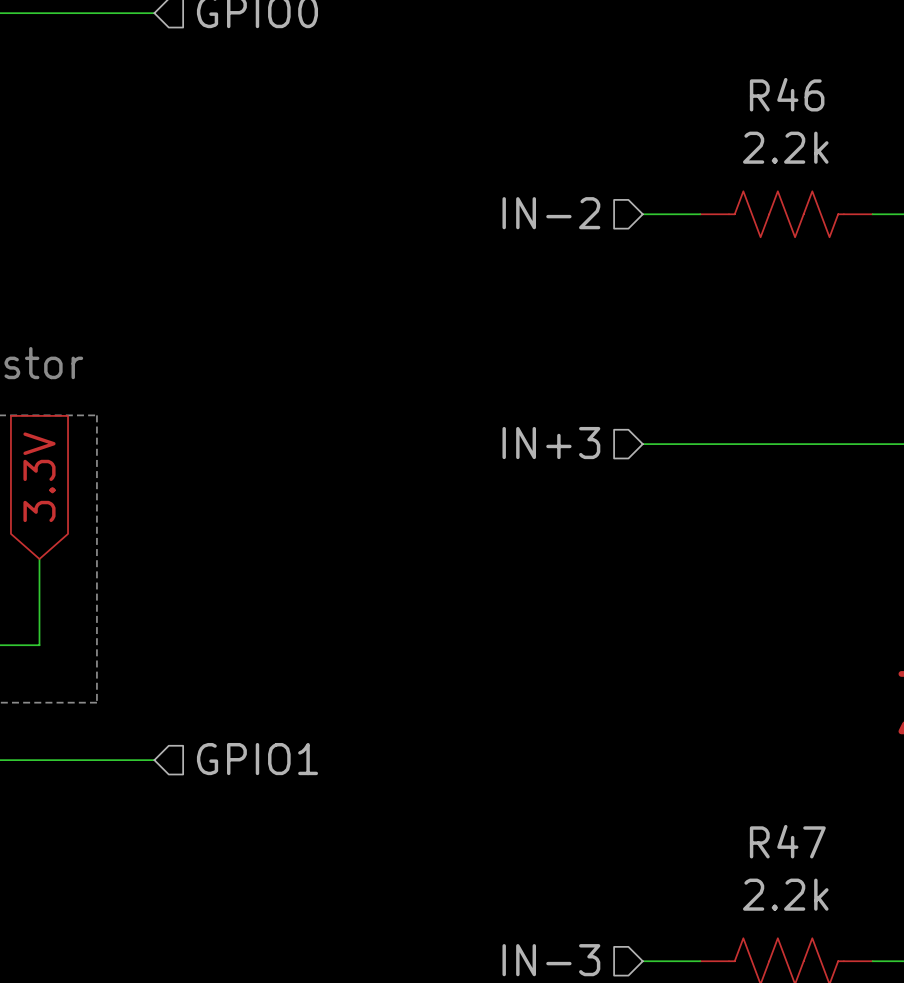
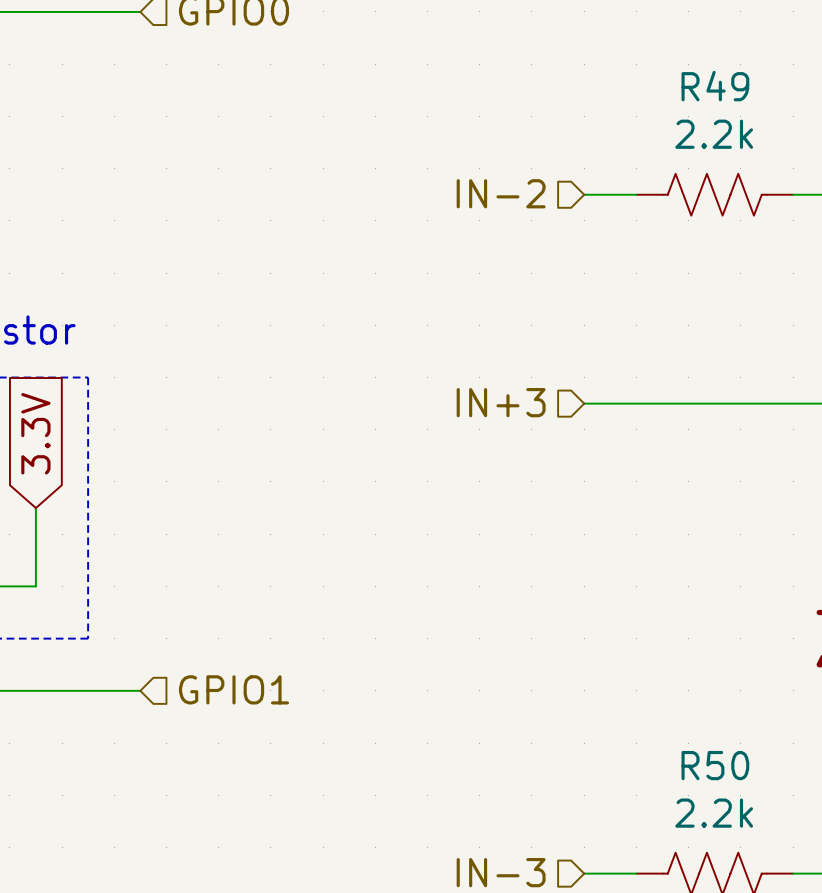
R46 name: R46 (787, 94) -> R49 (715, 86)
R47 name: R47 (787, 841) -> R50 (715, 765)

